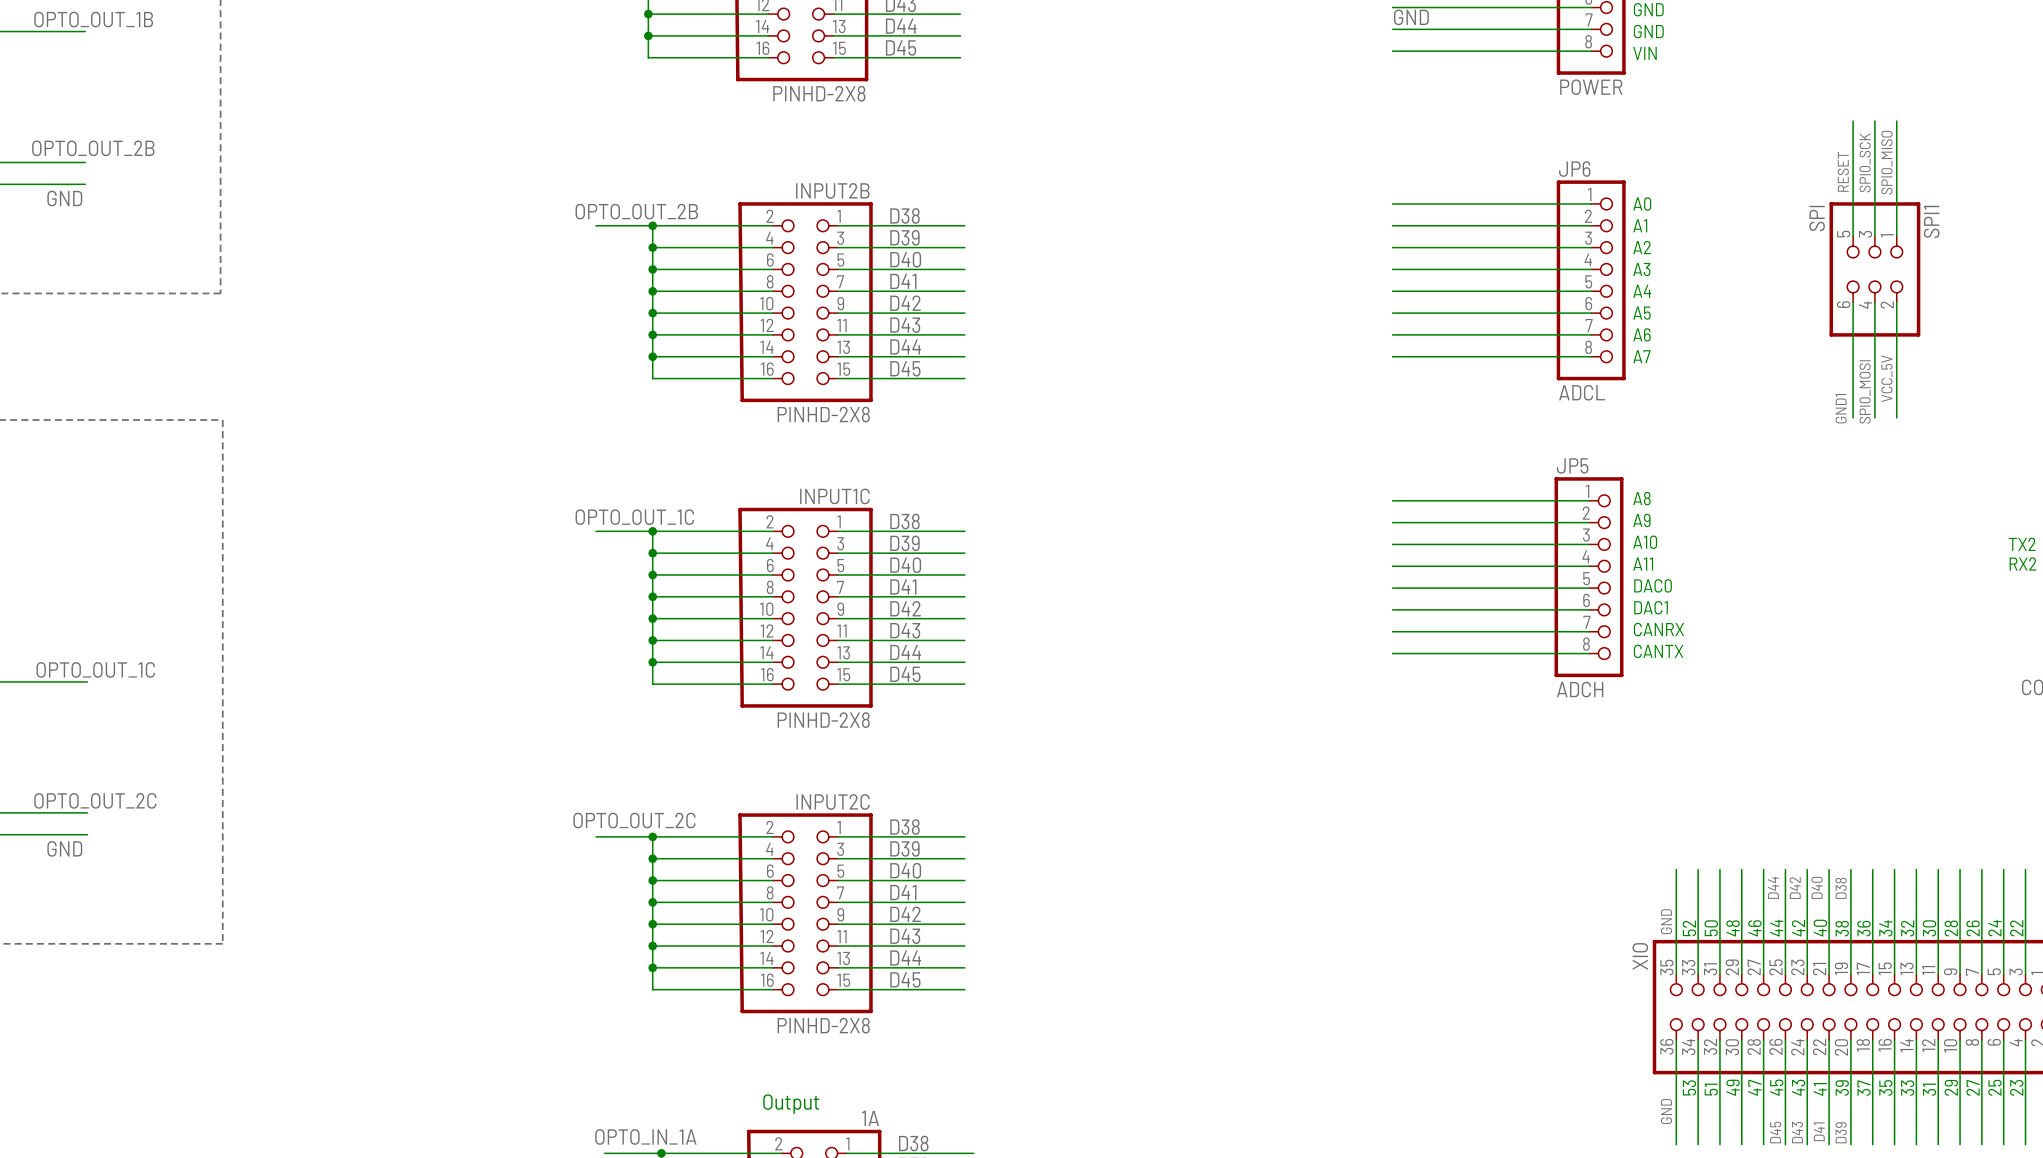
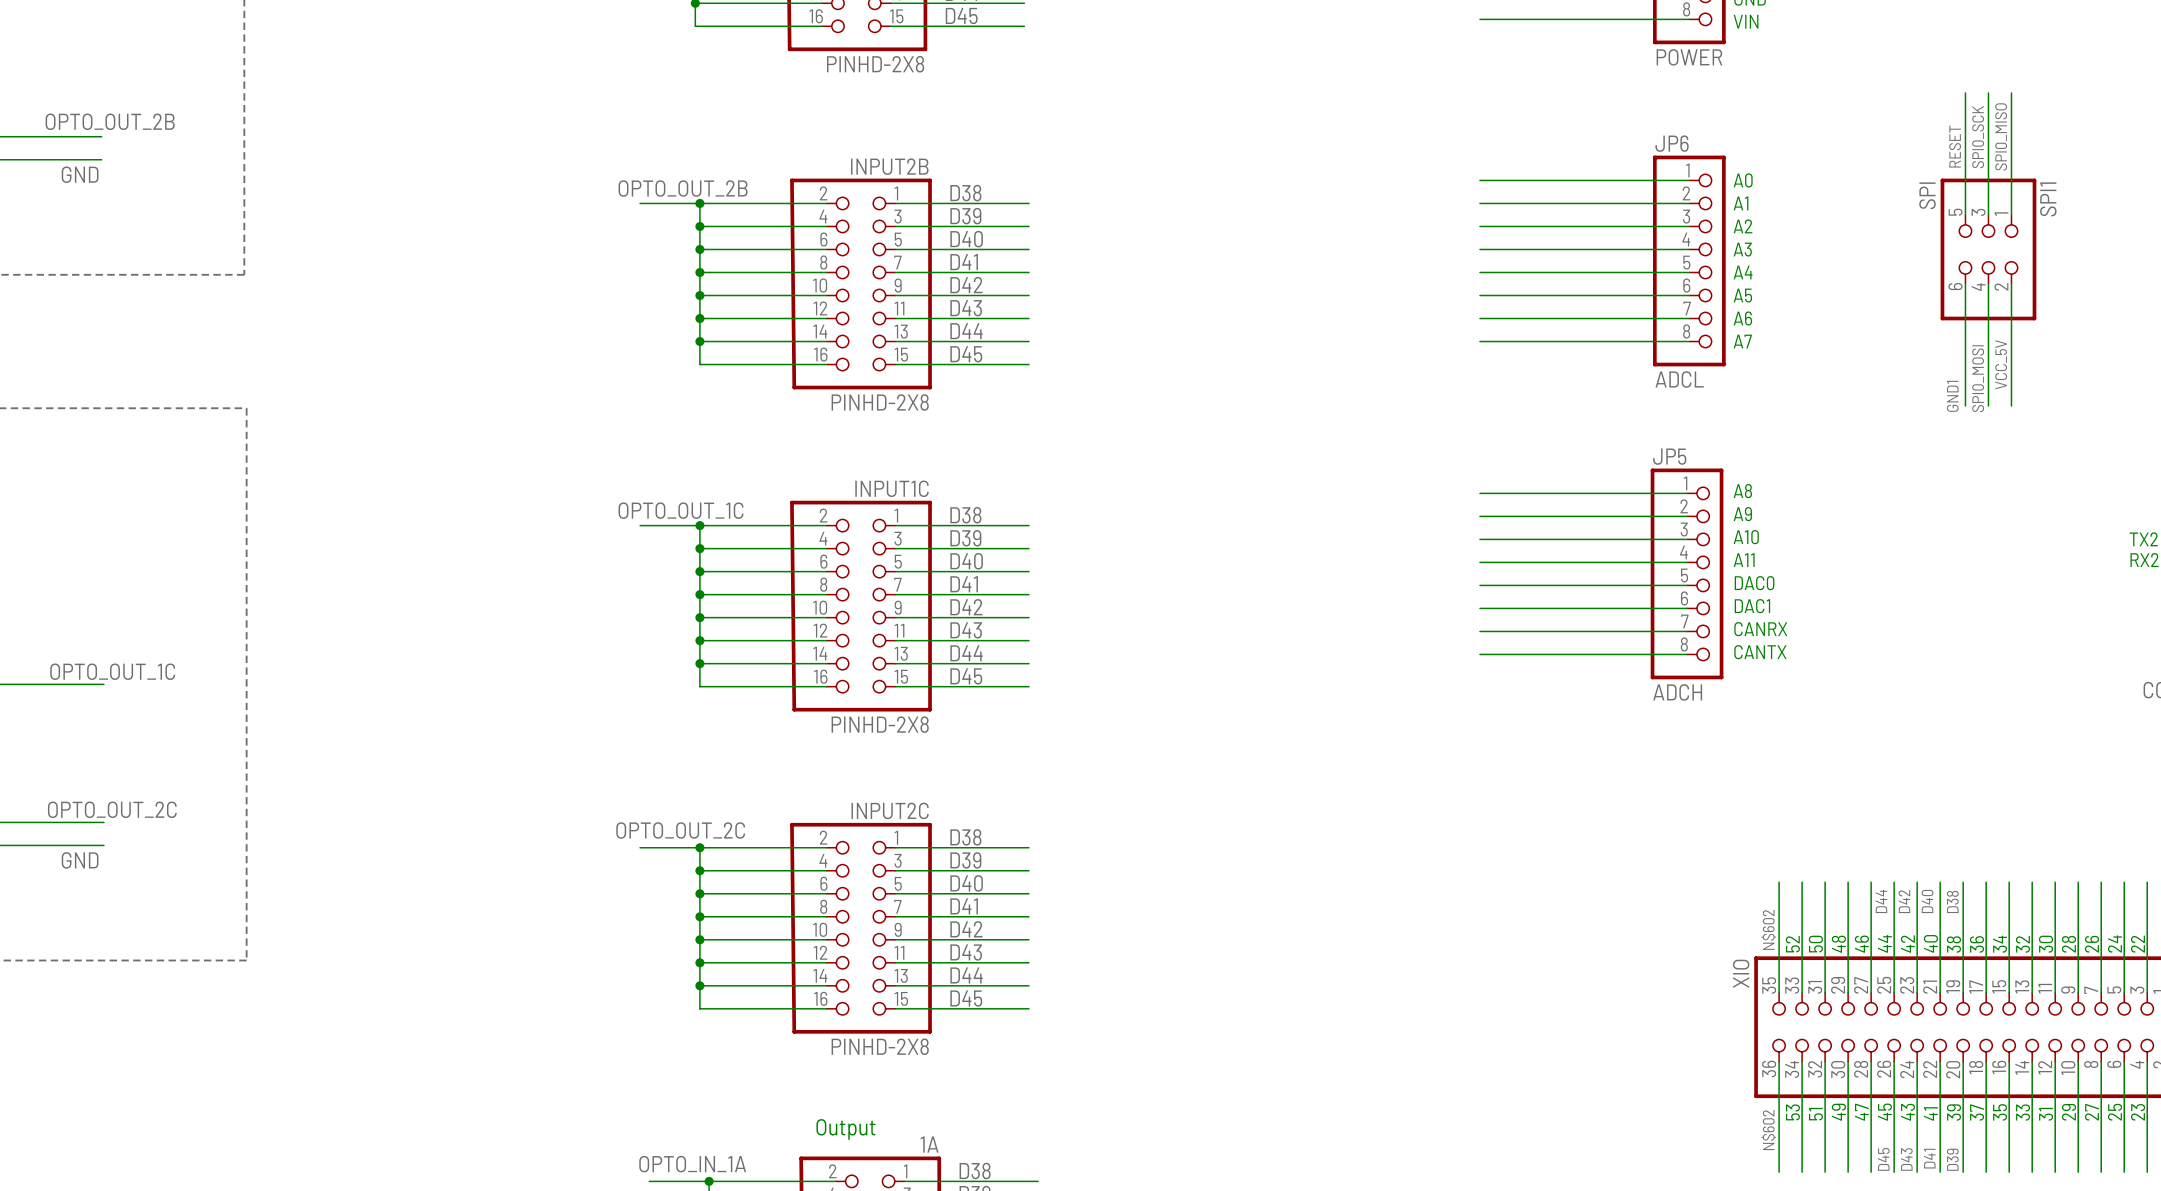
label: GND (1666, 921) -> N$602 (1768, 929)
label: GND (1666, 1111) -> N$602 (1768, 1130)

